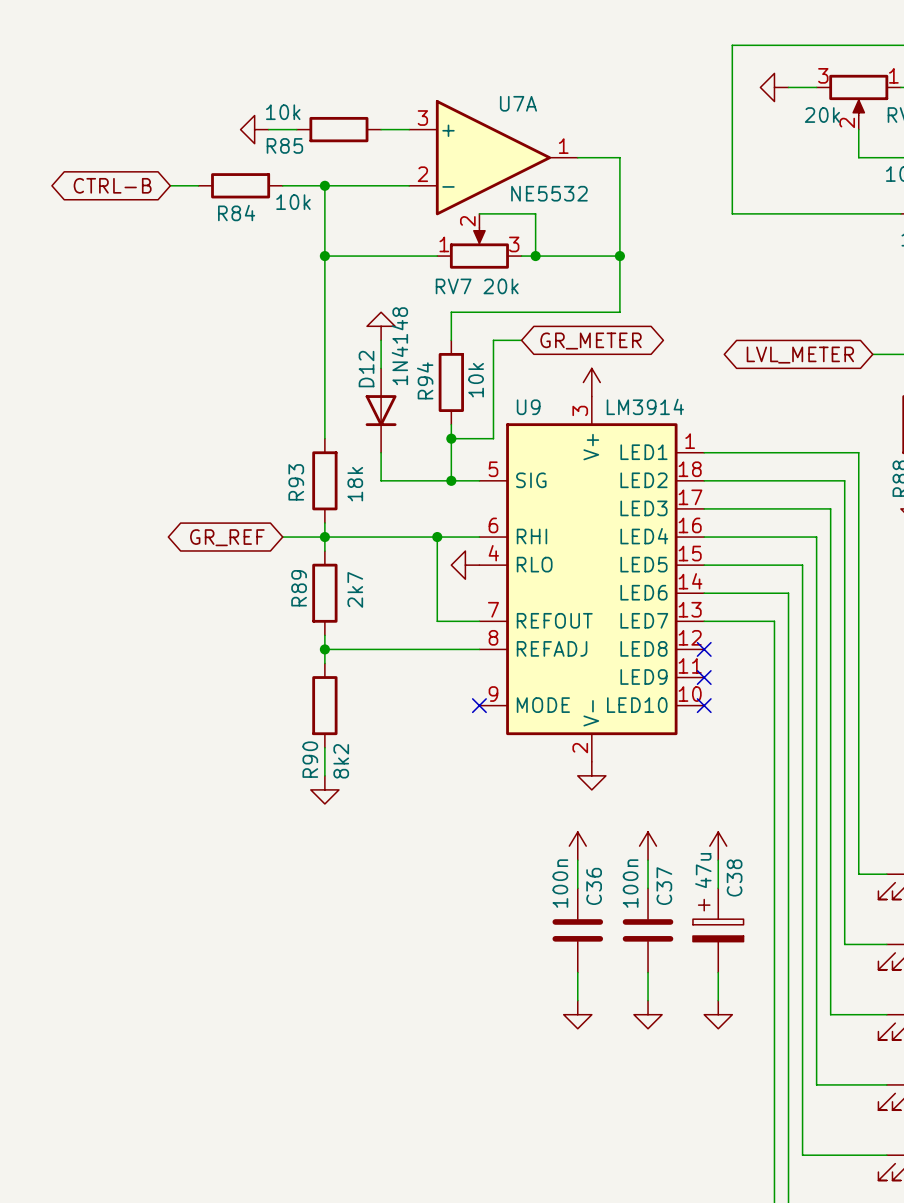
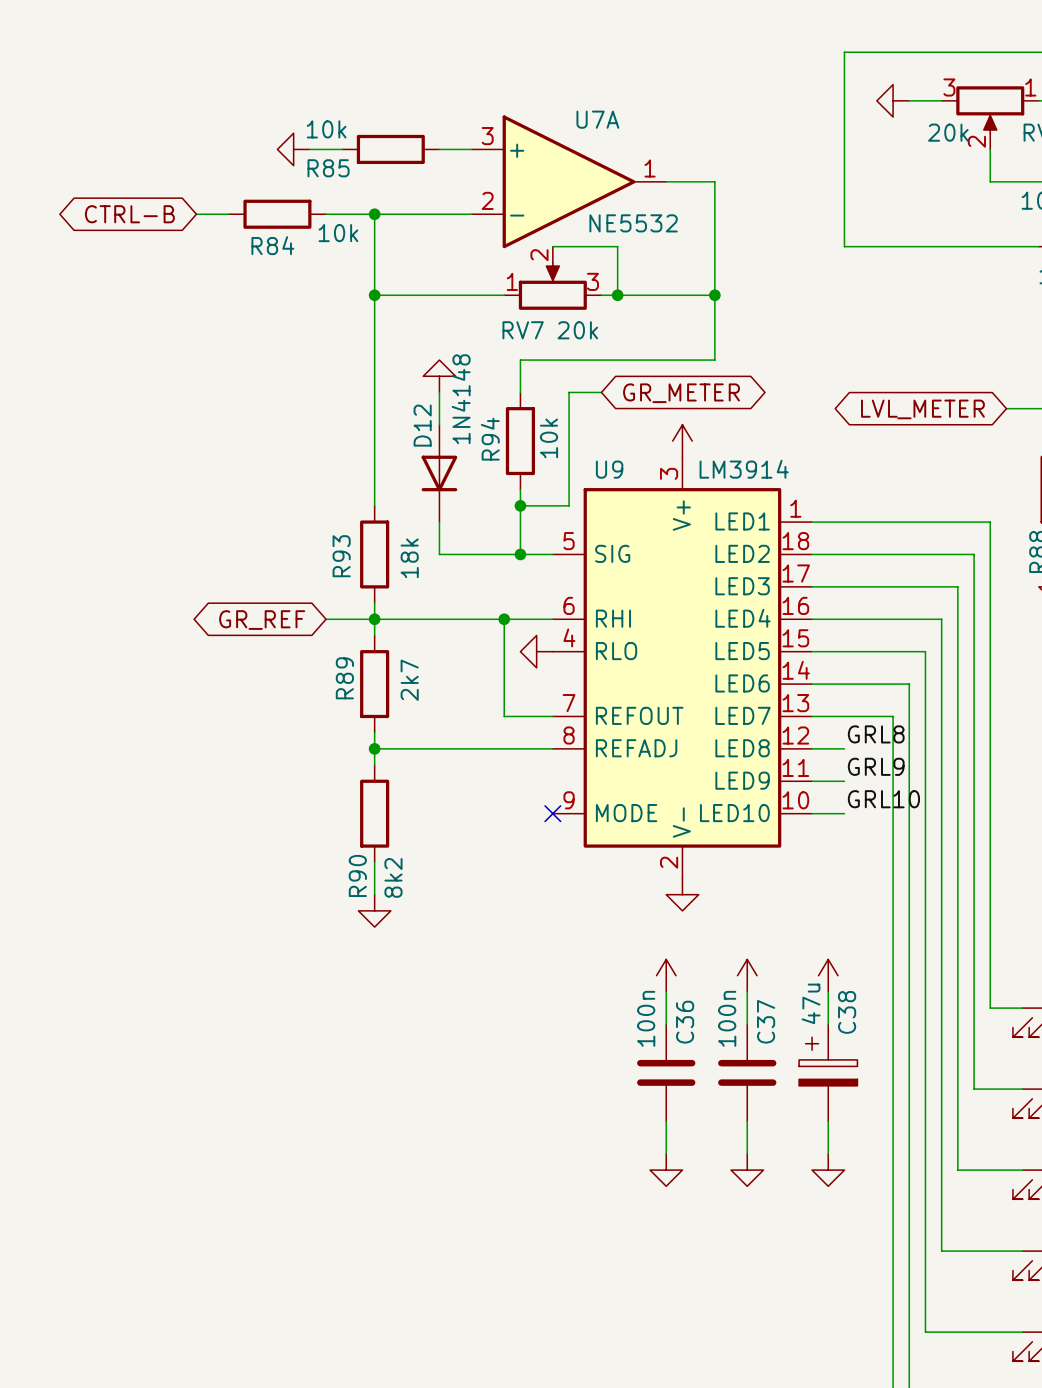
label: none -> GRL8 (876, 734)
wire: none -> (812, 748) (844, 748)
no-connect mark: (704, 649) -> none
label: none -> GRL9 (876, 766)
wire: none -> (812, 781) (844, 781)
no-connect mark: (704, 677) -> none
label: none -> GRL10 (883, 799)
wire: none -> (812, 813) (844, 813)
no-connect mark: (704, 705) -> none

